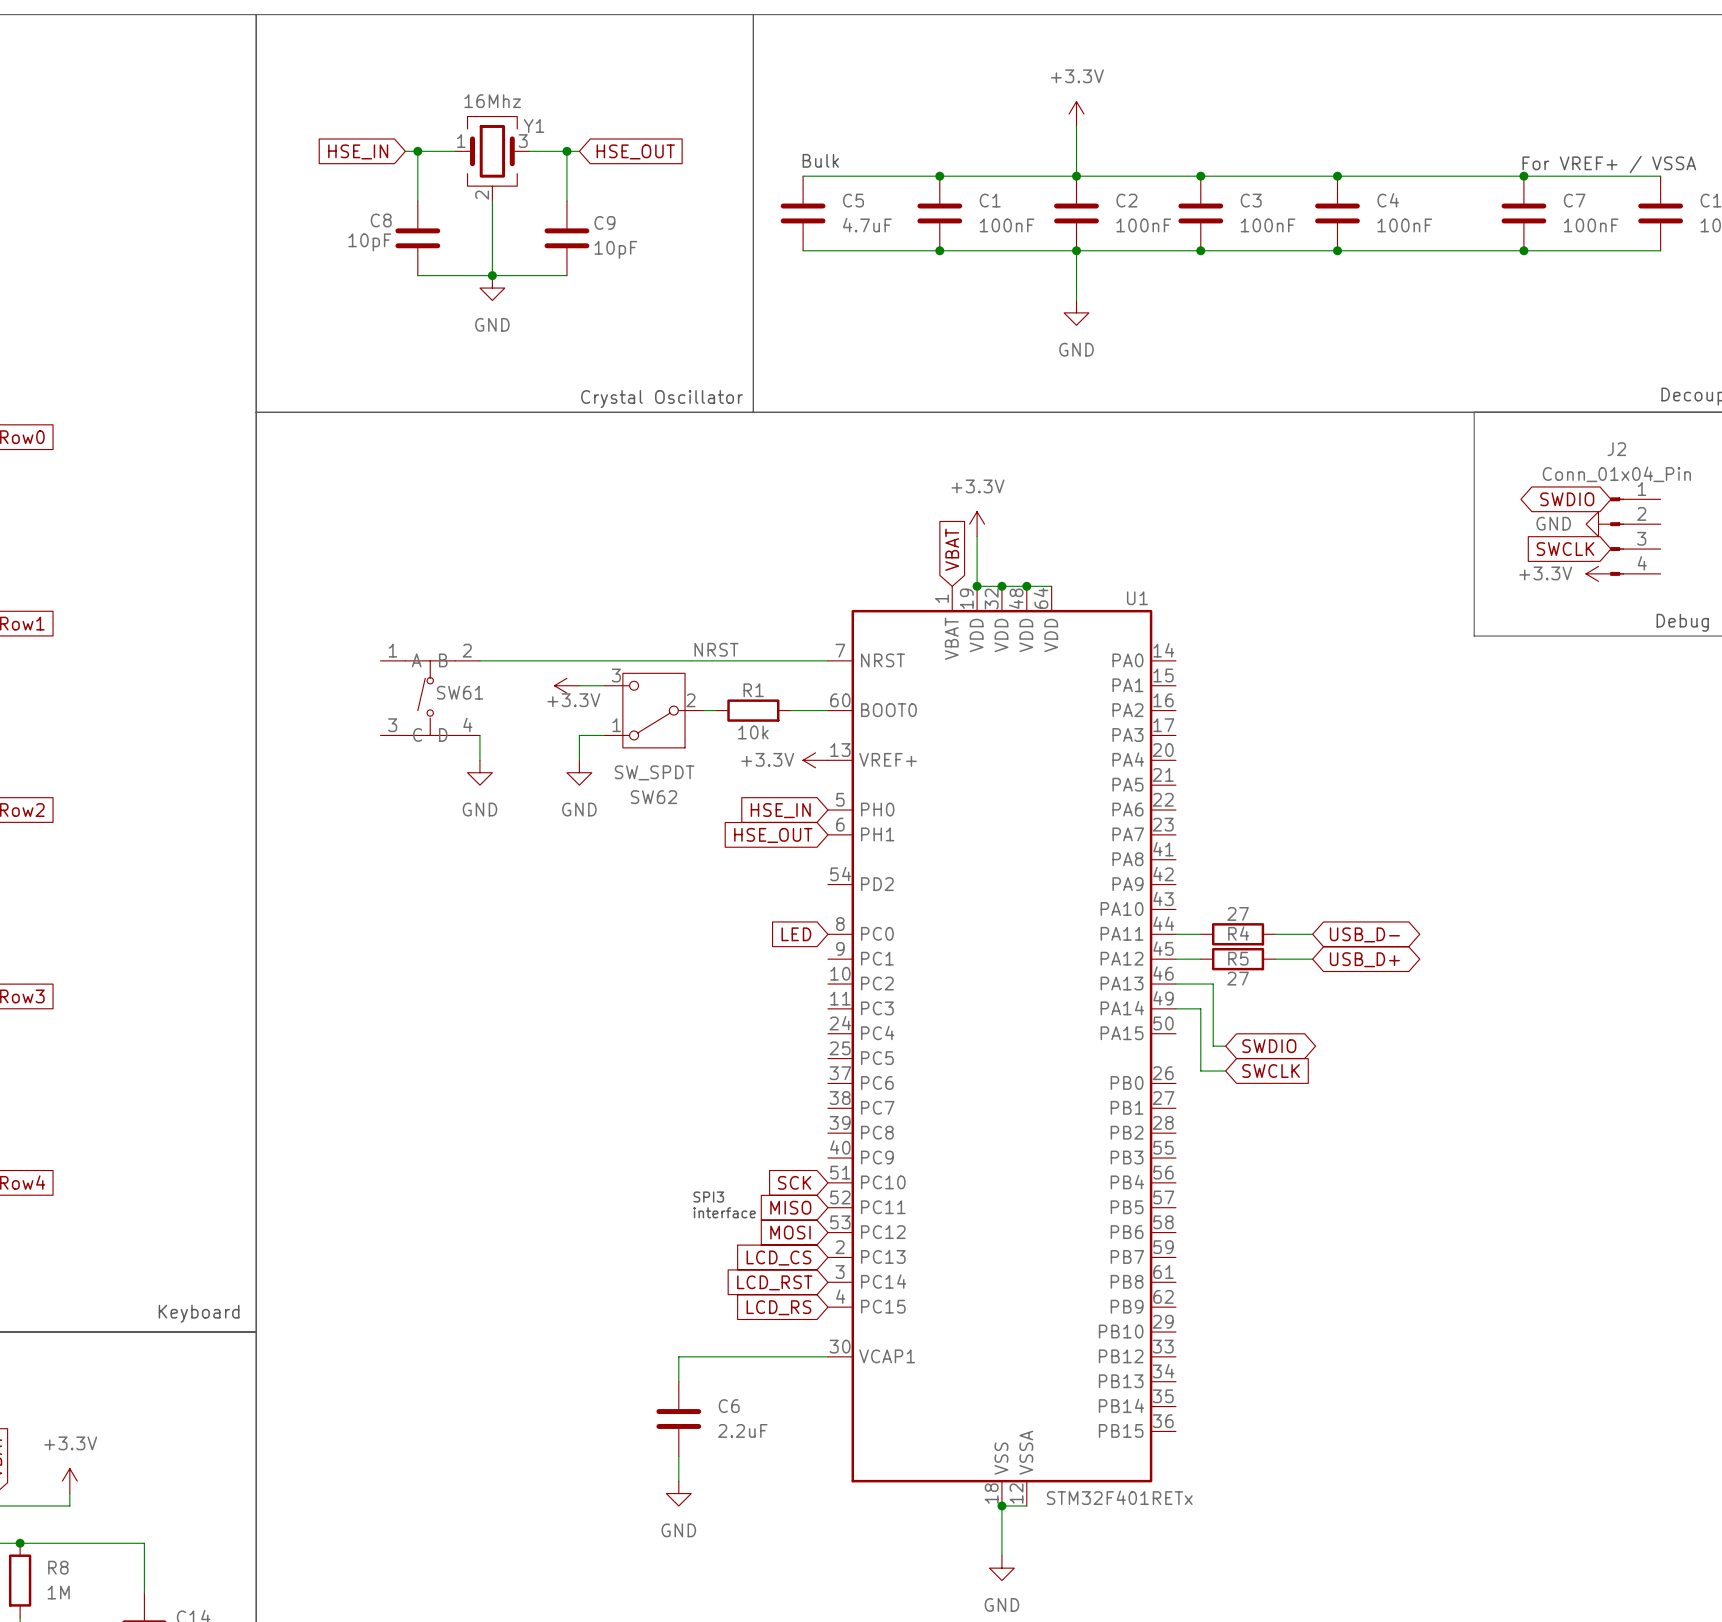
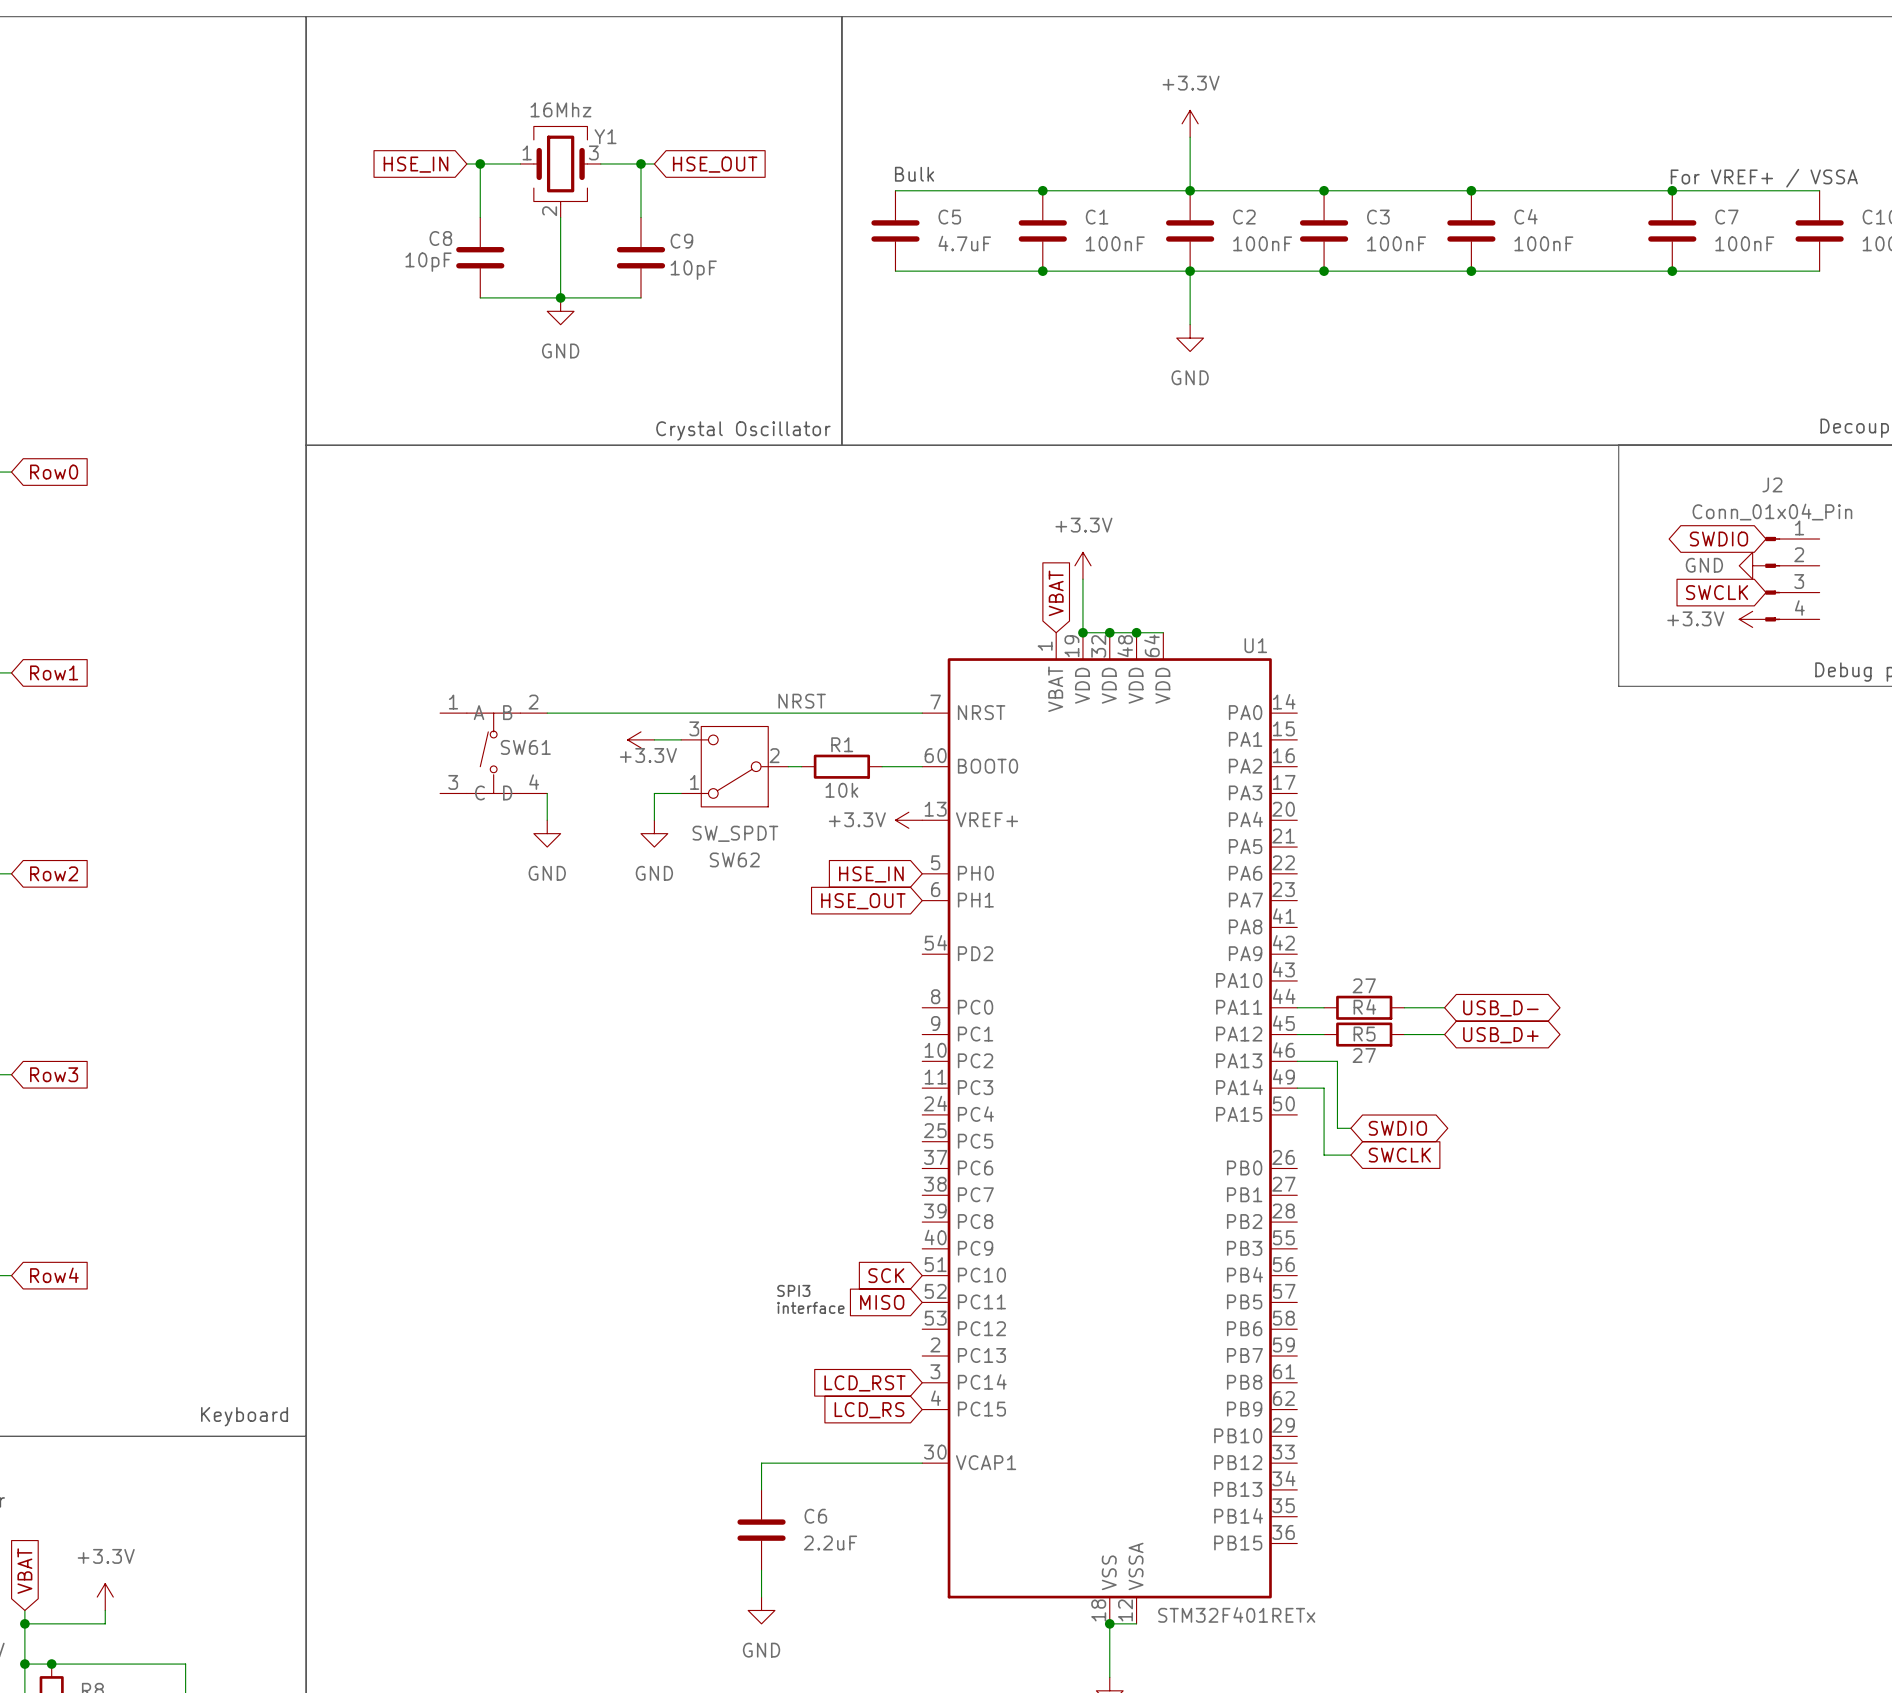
global label: LED (796, 934) -> none
global label: MOSI (790, 1232) -> none
global label: LCD_CS (778, 1258) -> none

